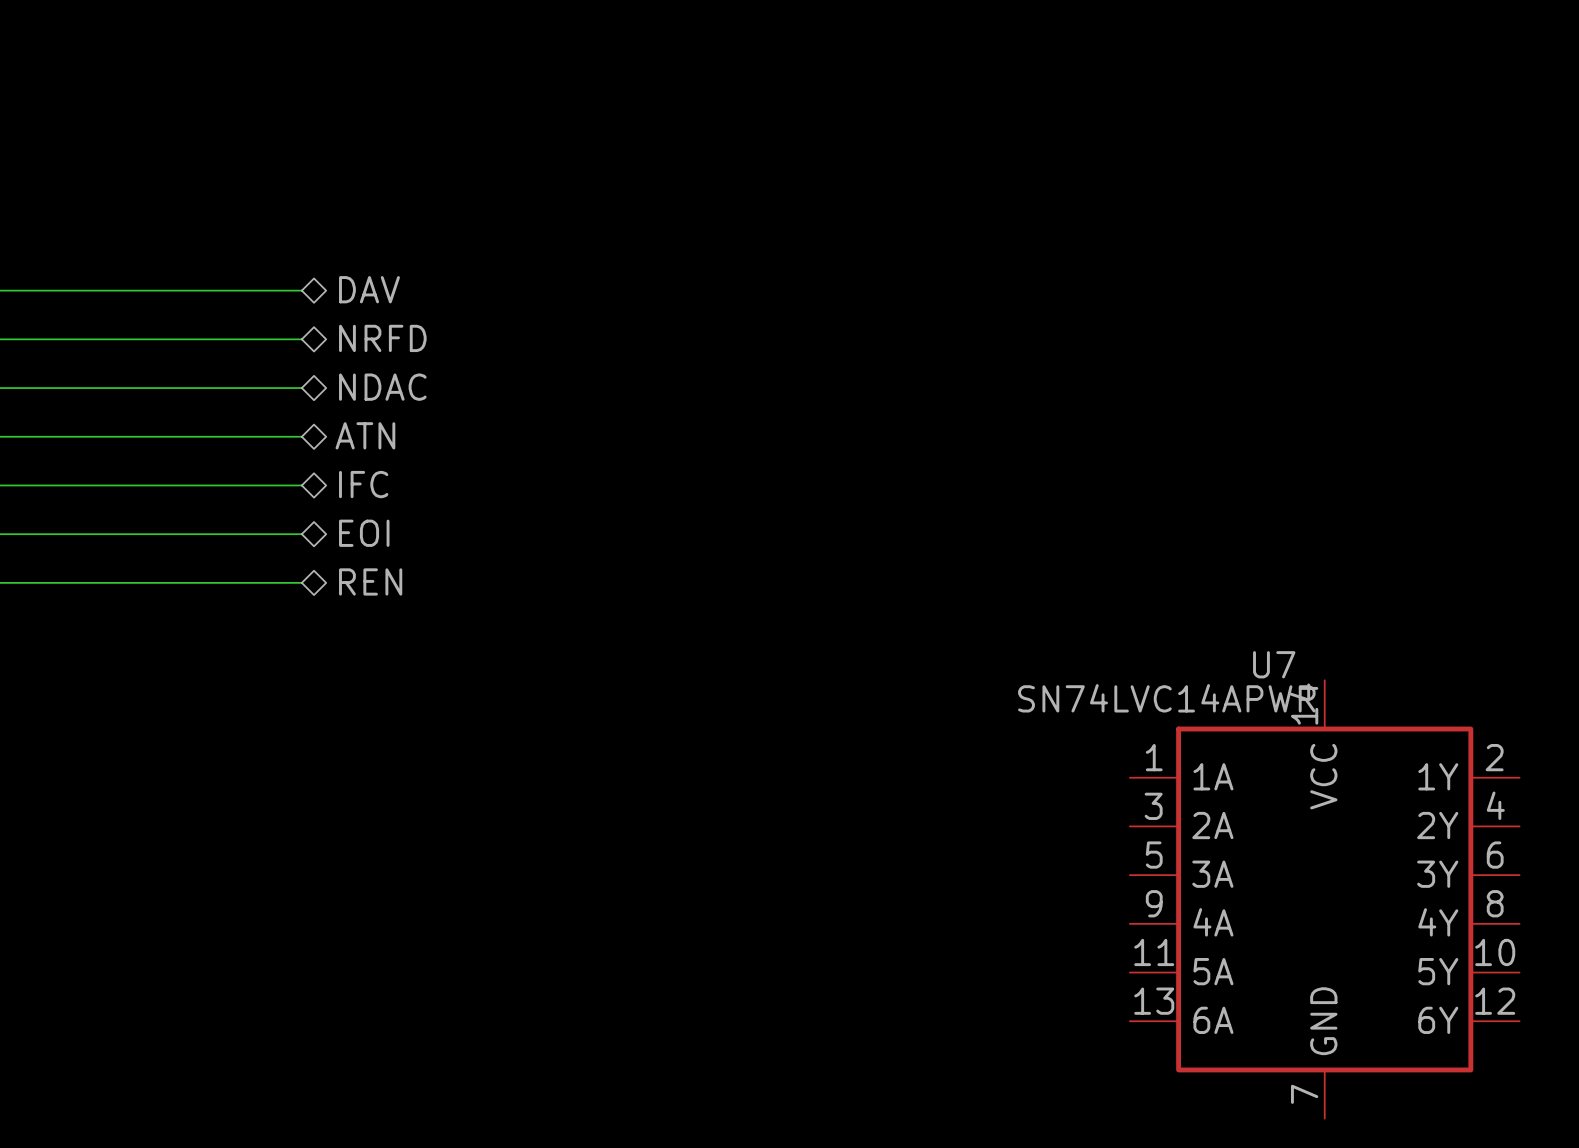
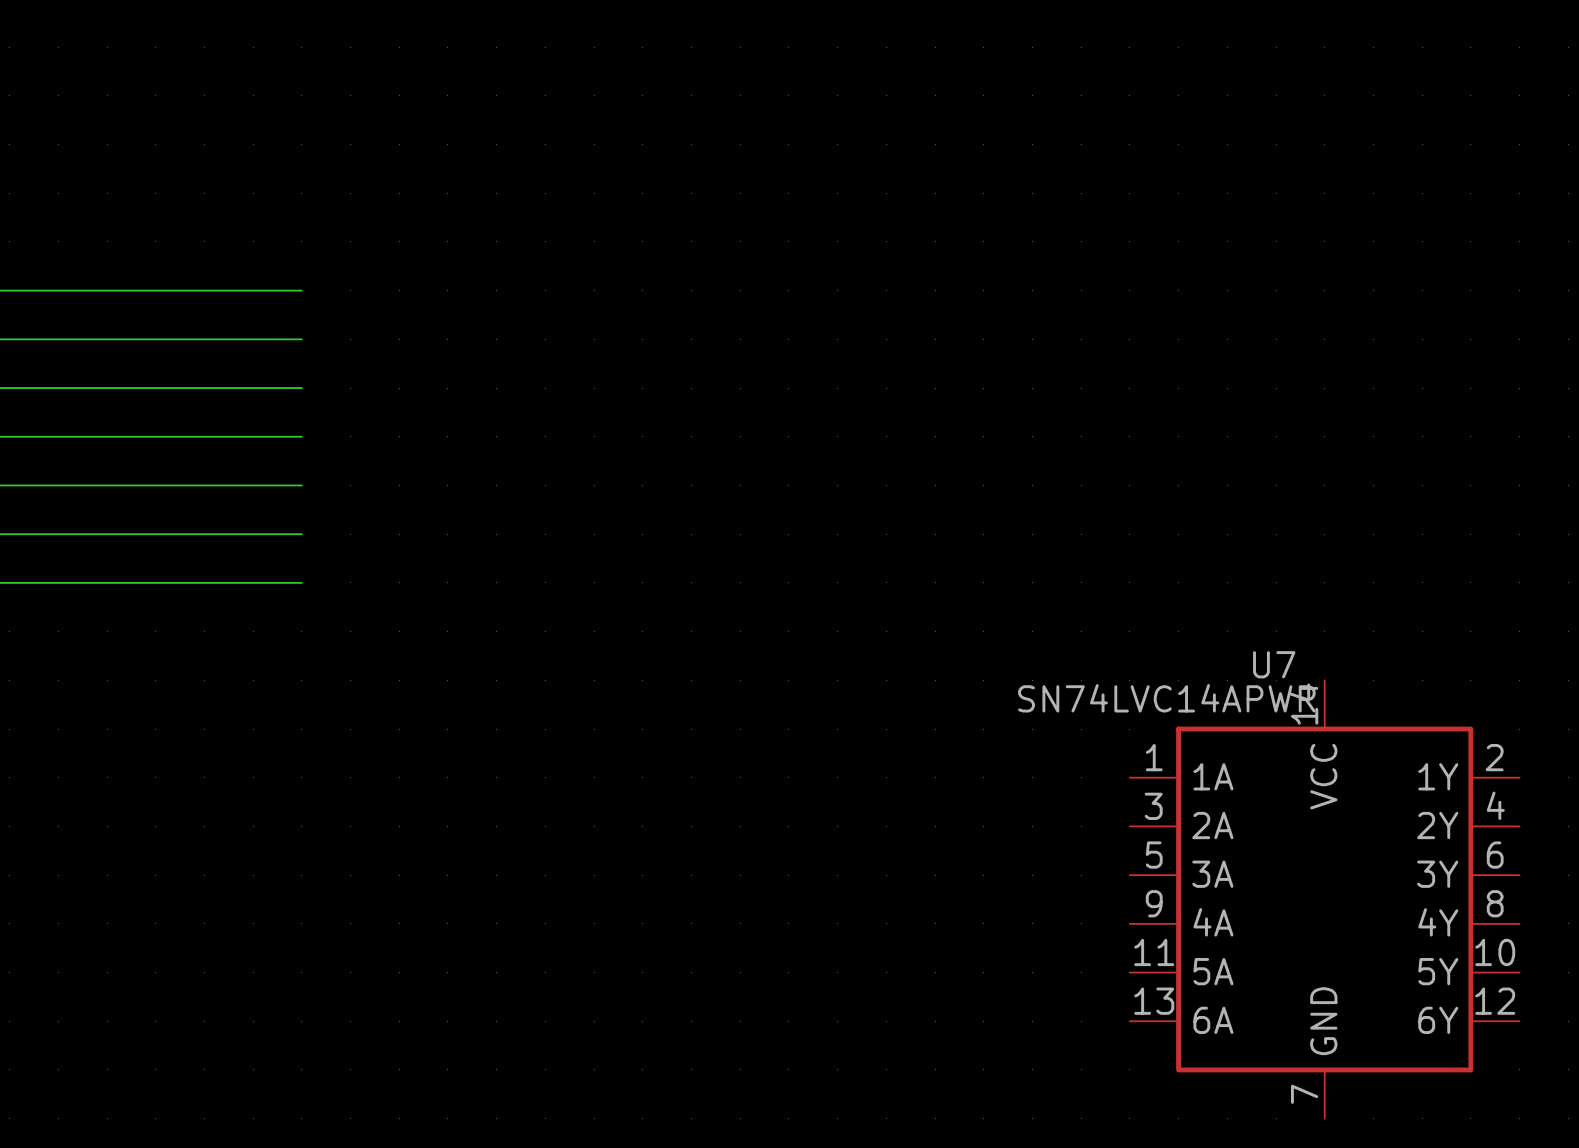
hierarchical label: DAV (369, 289) -> none
hierarchical label: NRFD (382, 338) -> none
hierarchical label: NDAC (382, 387) -> none
hierarchical label: ATN (365, 435) -> none
hierarchical label: IFC (363, 484) -> none
hierarchical label: EOI (364, 533) -> none
hierarchical label: REN (370, 581) -> none

